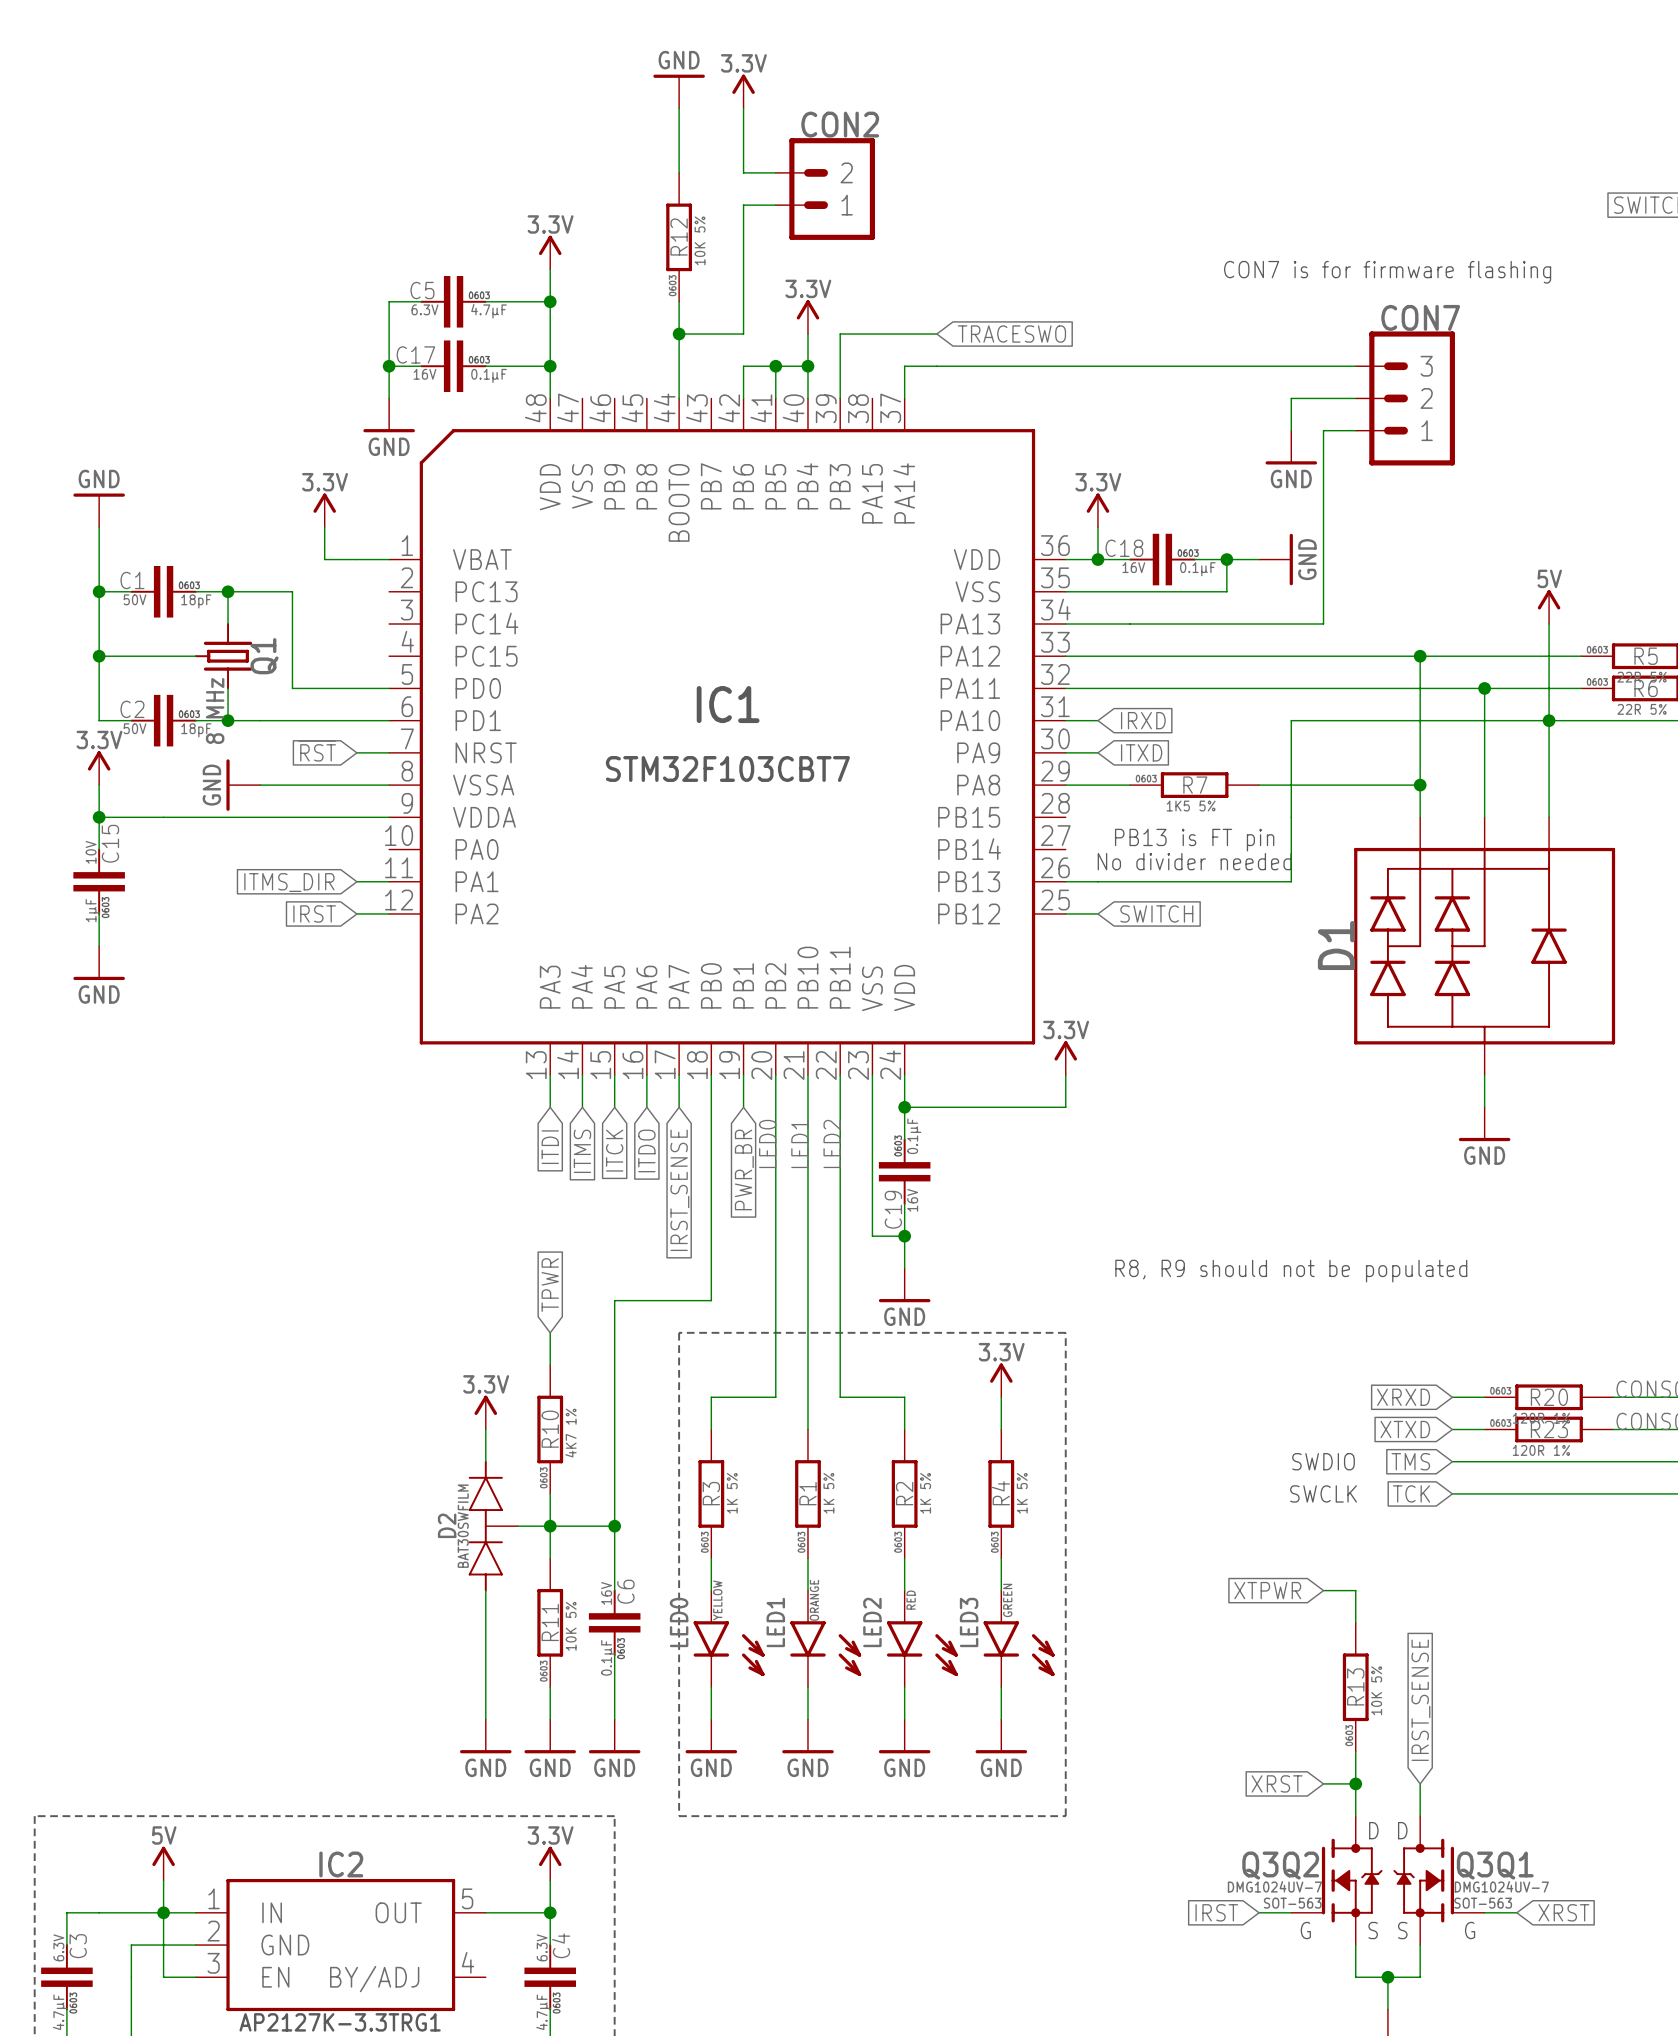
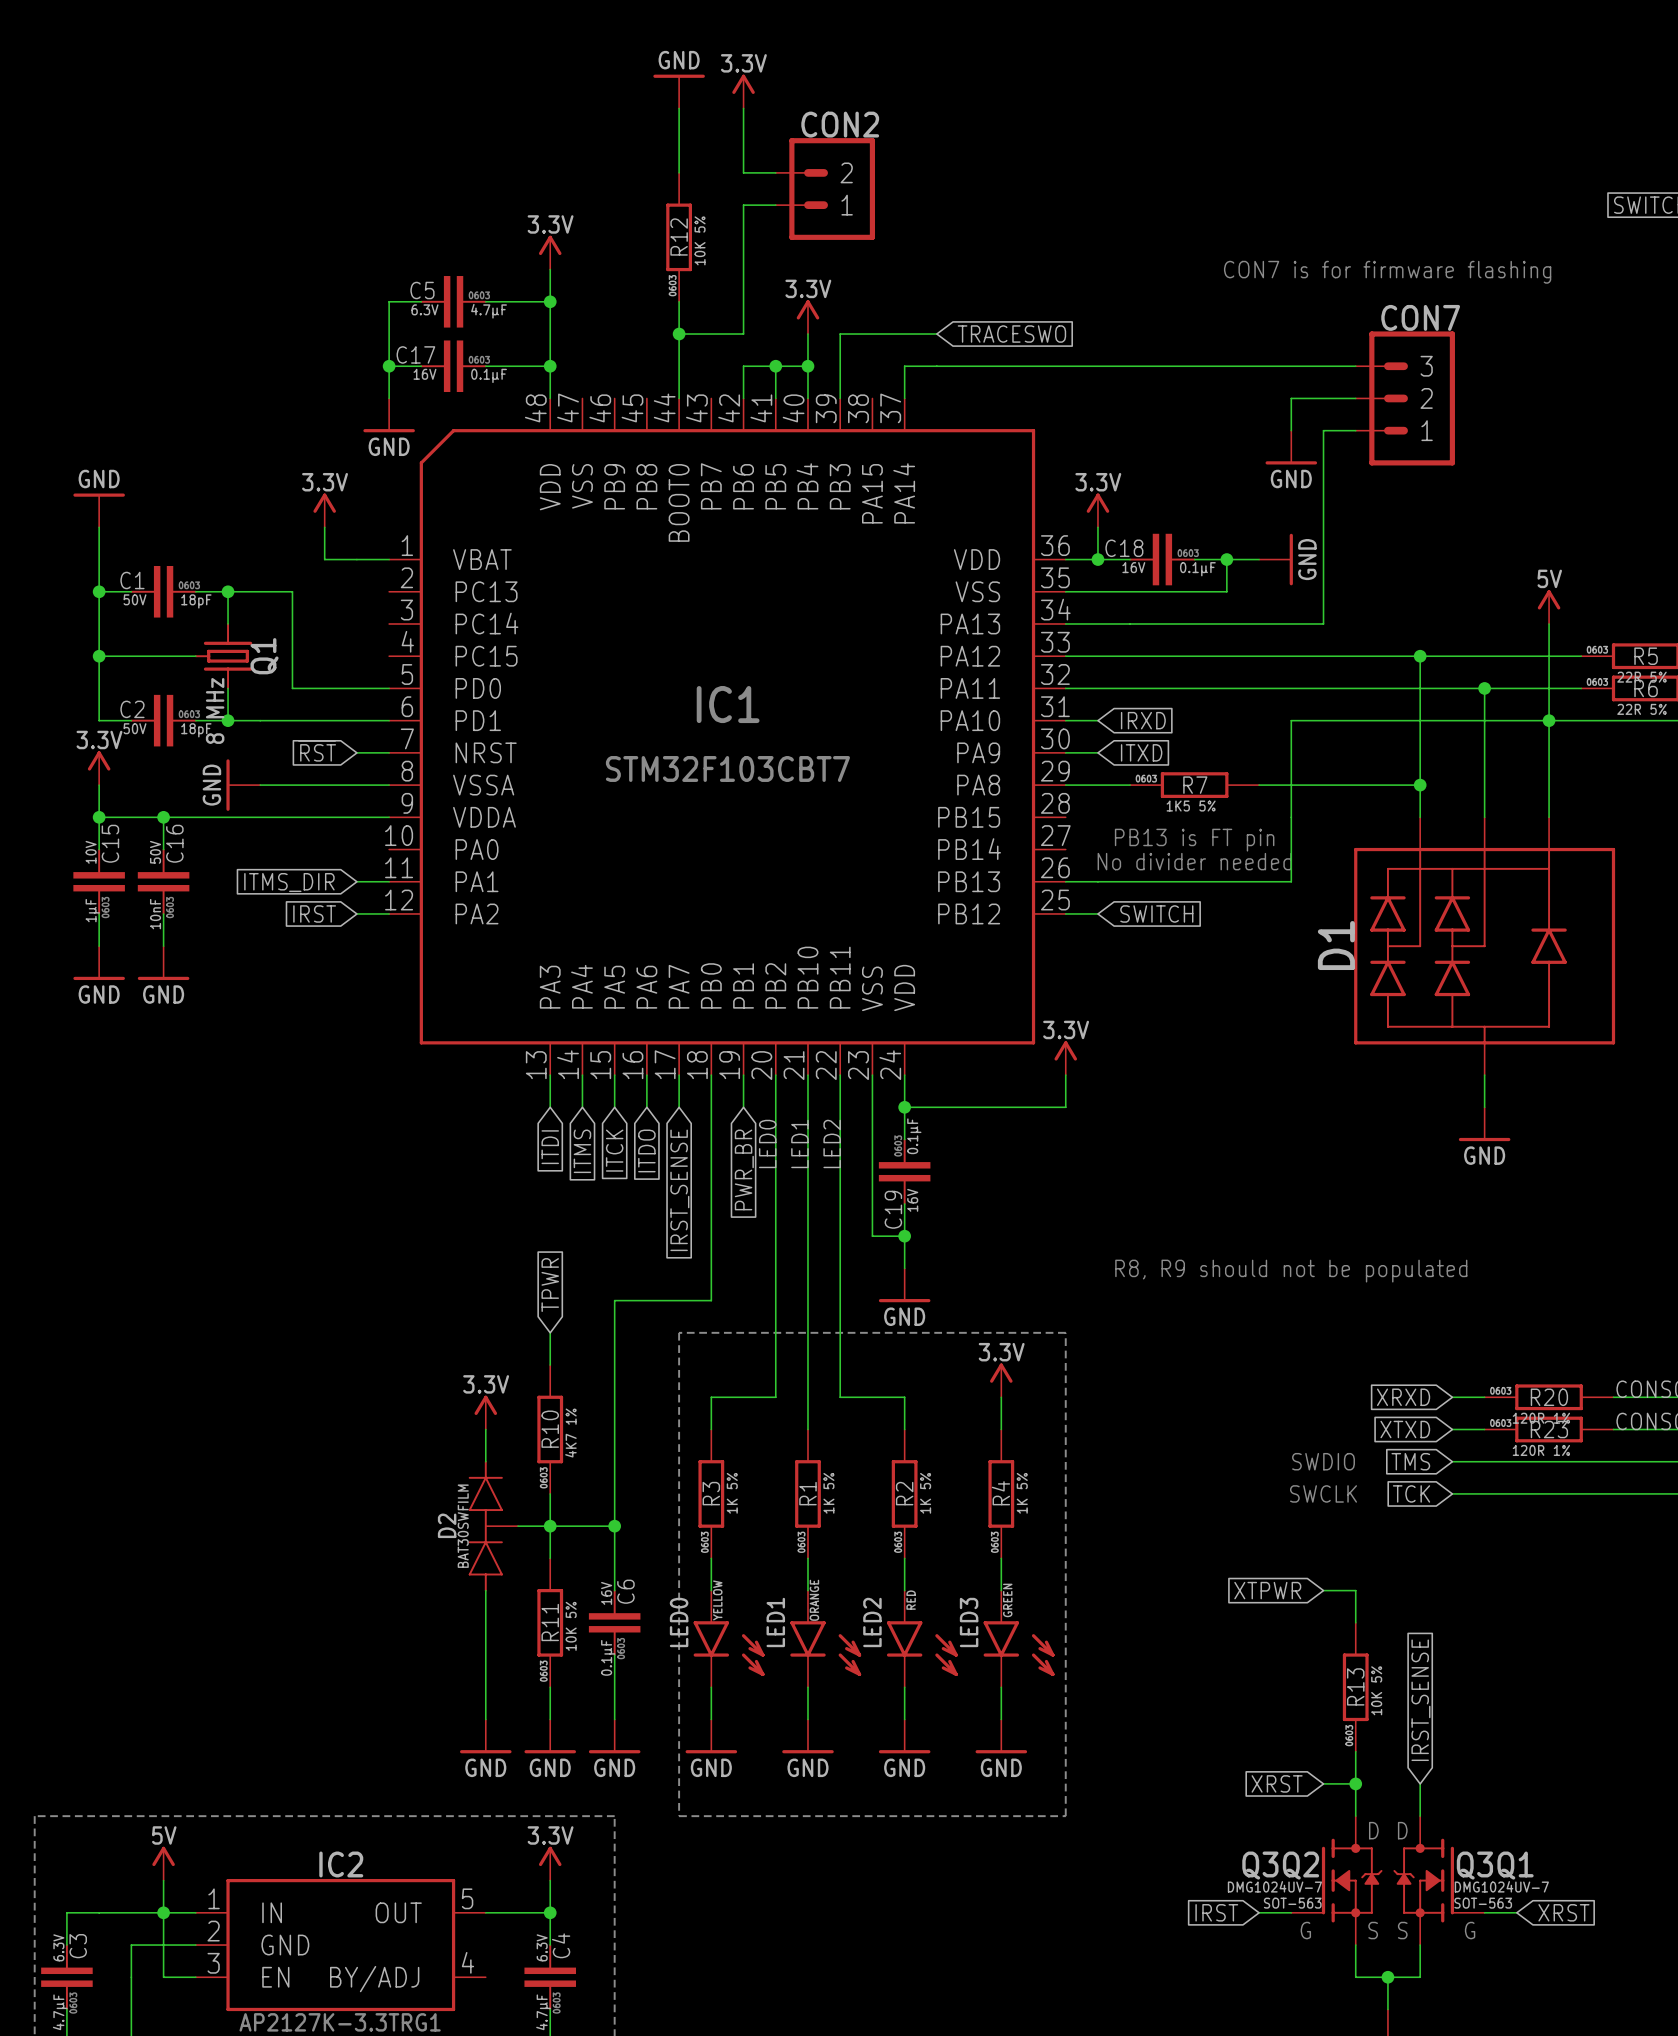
wire: none -> (163, 817) (163, 849)
junction: none -> (163, 817)
C16: none -> 10nF (163, 881)
wire: none -> (163, 913) (163, 946)
power symbol: none -> GND (163, 963)

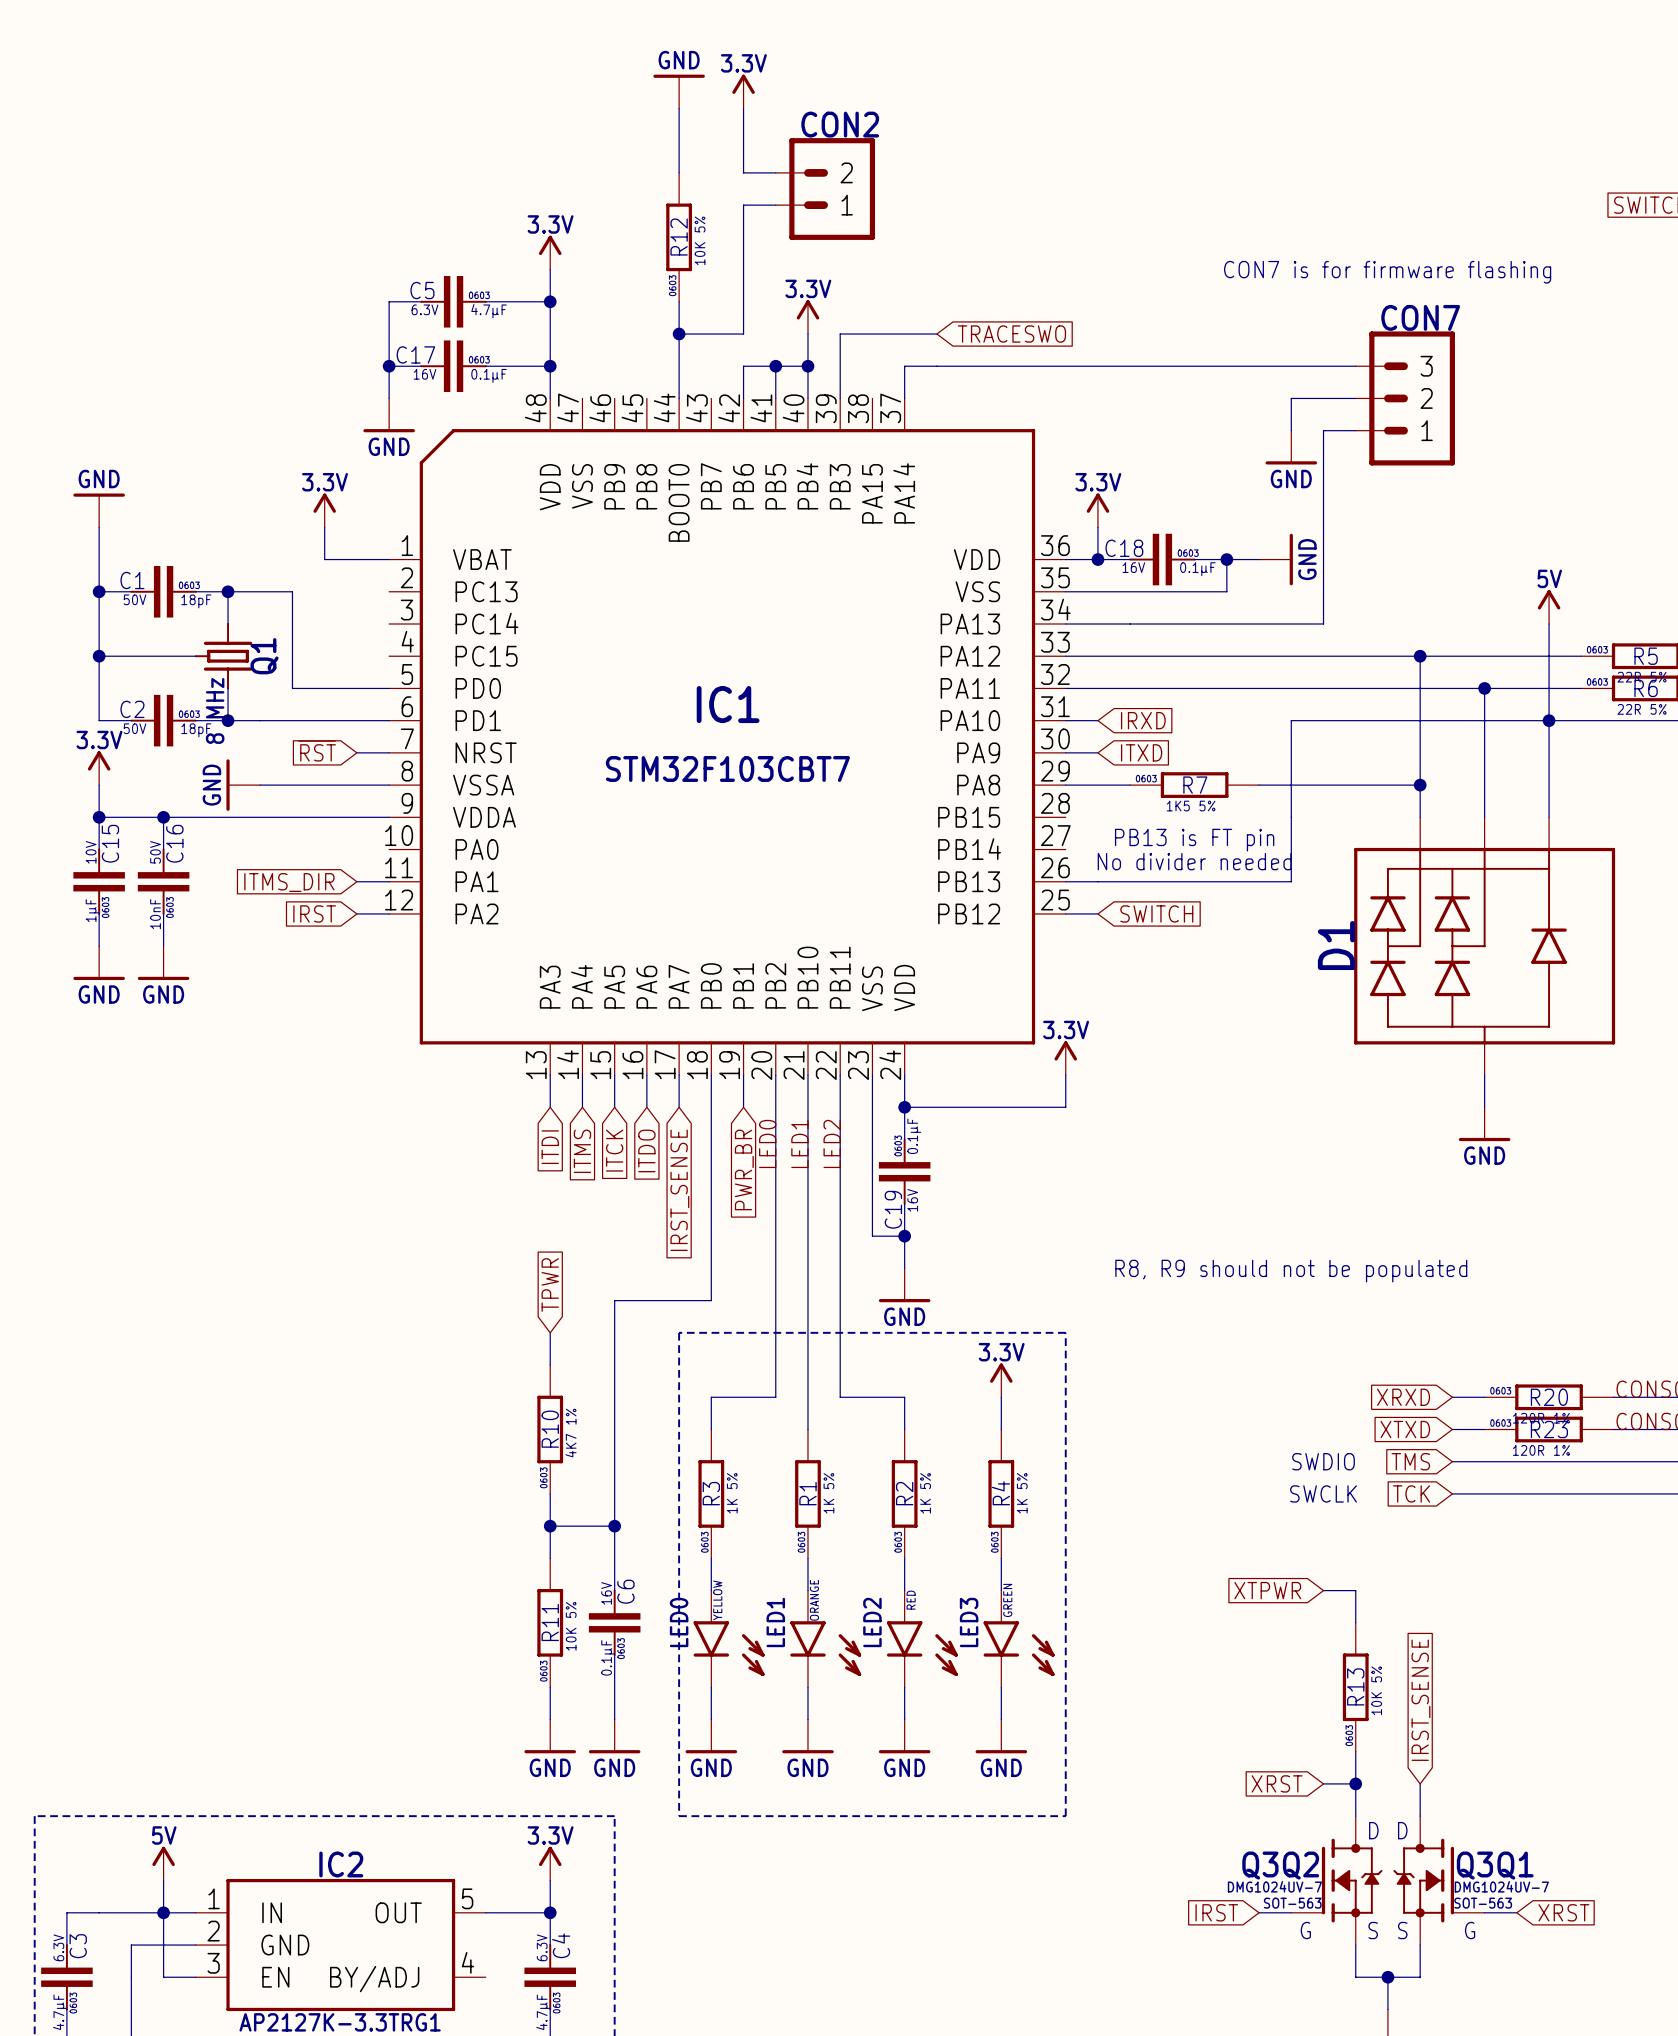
power symbol: 3.3V (485, 1412) -> none
wire: (485, 1429) (485, 1461) -> none
D2: (493, 1526) -> none
wire: (518, 1526) (550, 1526) -> none
wire: (485, 1590) (485, 1719) -> none
power symbol: GND (485, 1736) -> none

